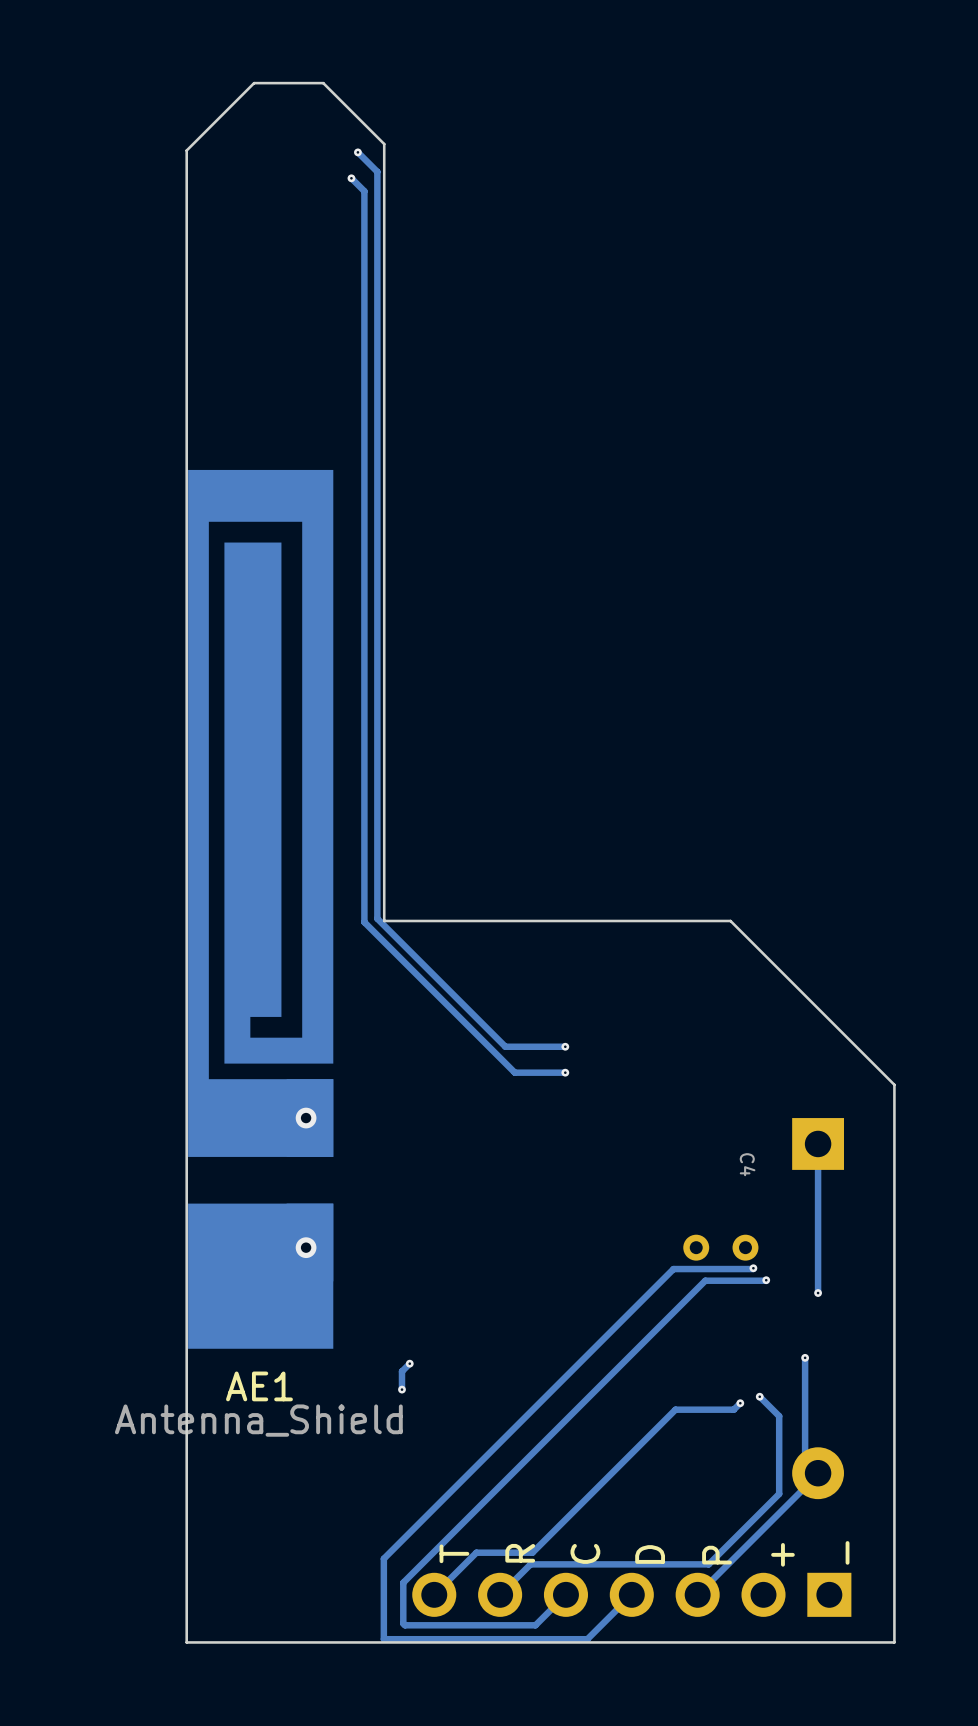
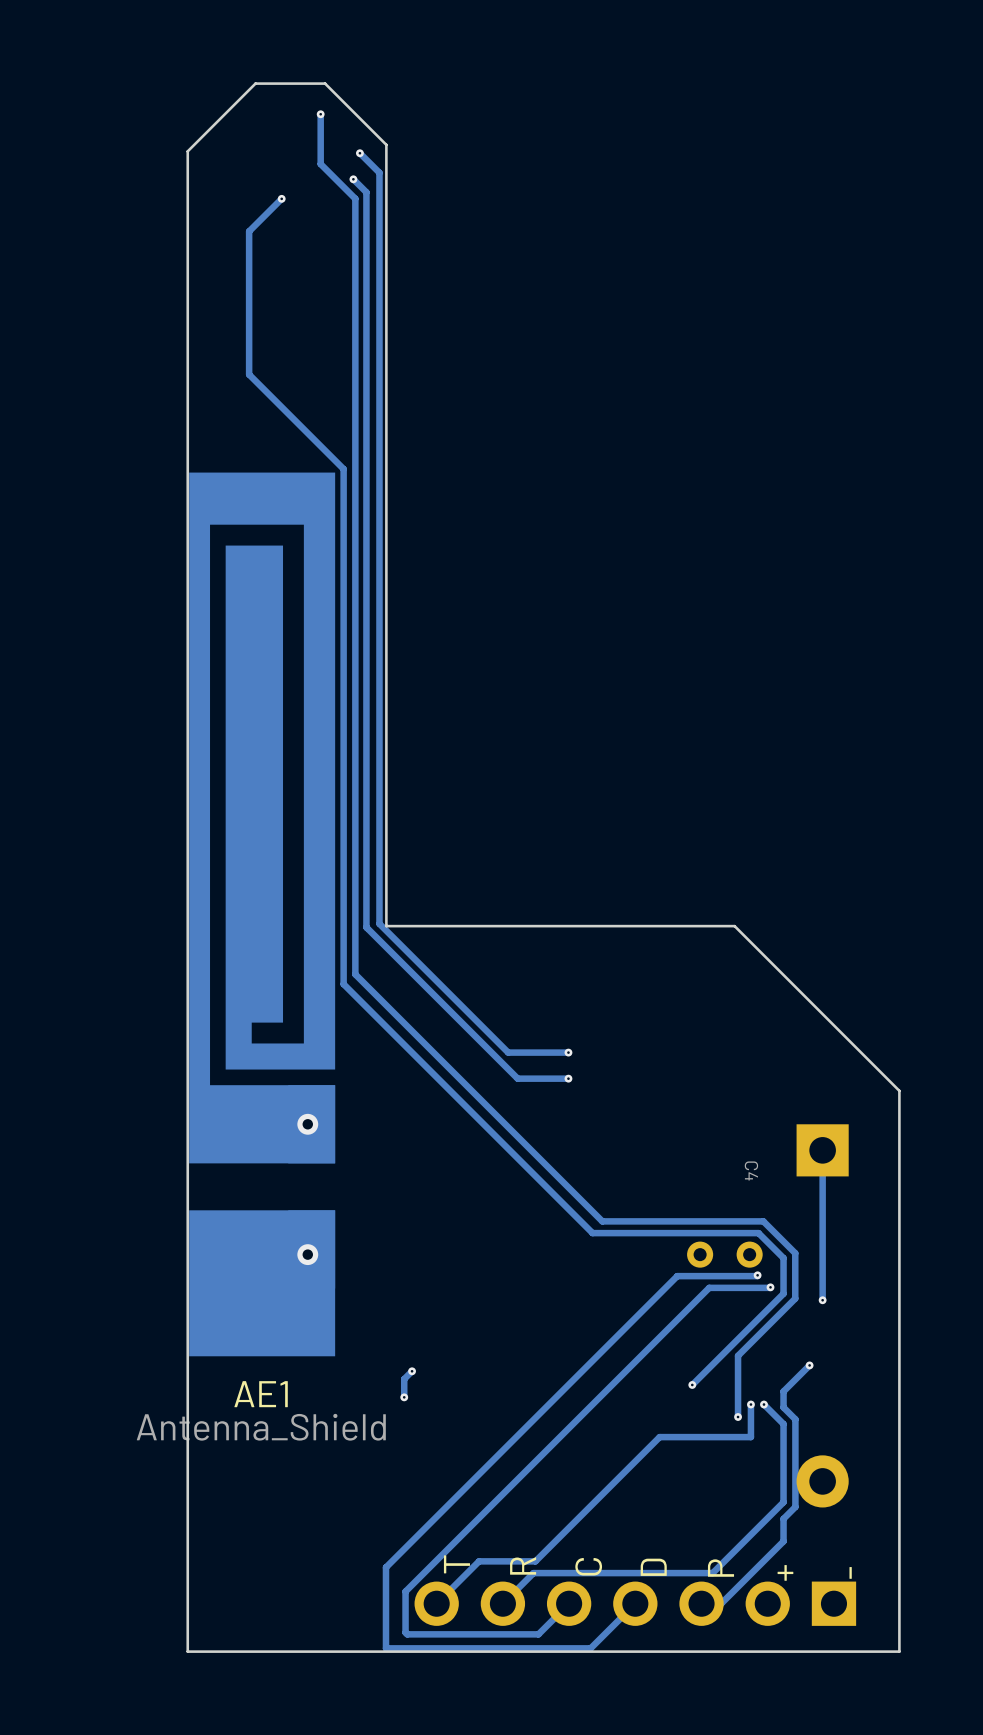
track: none -> (320, 114) (320, 164) (355, 198) (355, 974) (602, 1221) (763, 1221) (795, 1253) (795, 1298) (738, 1355) (738, 1417)
via: none -> (320, 114)
track: none -> (281, 198) (249, 231) (249, 374) (343, 469) (343, 984) (592, 1233) (758, 1233) (783, 1258) (783, 1293) (692, 1384)
via: none -> (281, 198)
track: (805, 1357) (805, 1487) (697, 1594) -> (809, 1365) (783, 1391) (783, 1407) (795, 1419) (795, 1506) (783, 1518) (783, 1541) (721, 1603) (701, 1603)
via: none -> (692, 1384)
via: none -> (750, 1404)
track: (740, 1403) (733, 1409) (675, 1409) (656, 1429) -> (750, 1404) (750, 1437) (659, 1437)
via: (740, 1403) -> none
via: none -> (738, 1417)

